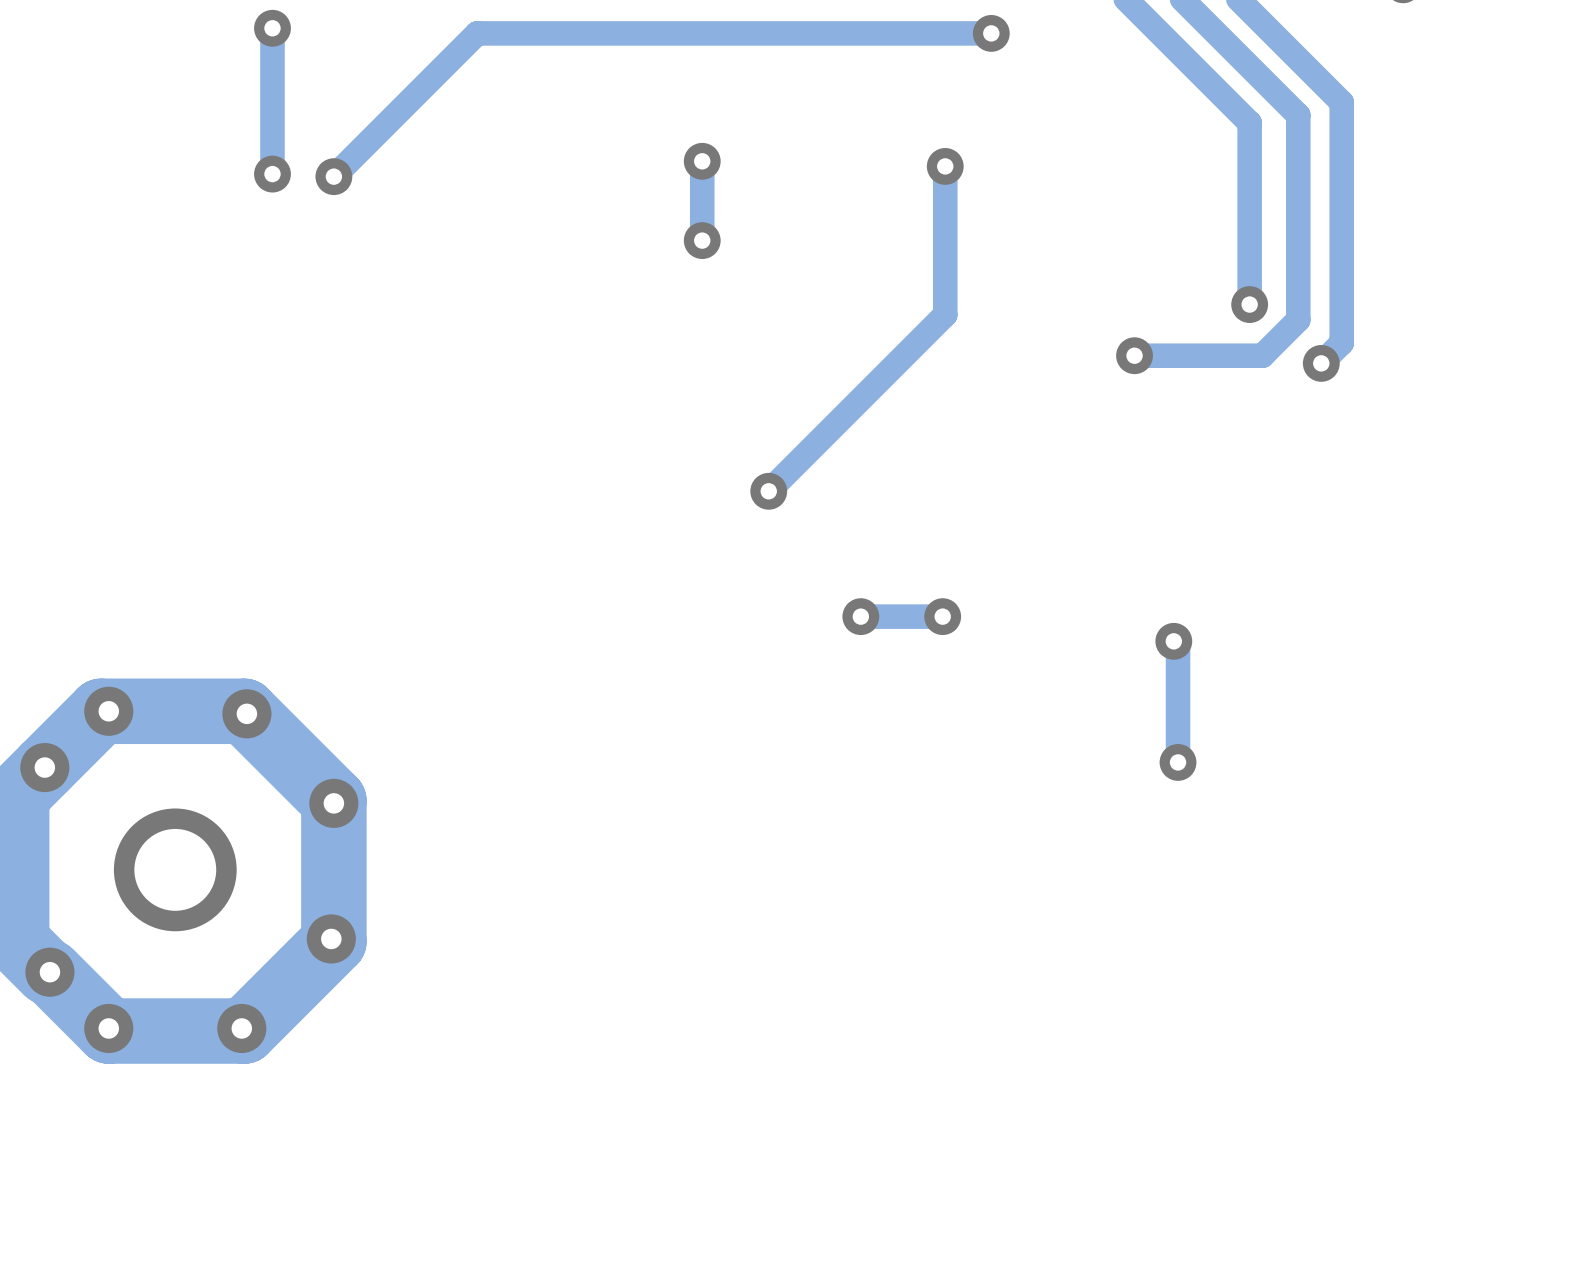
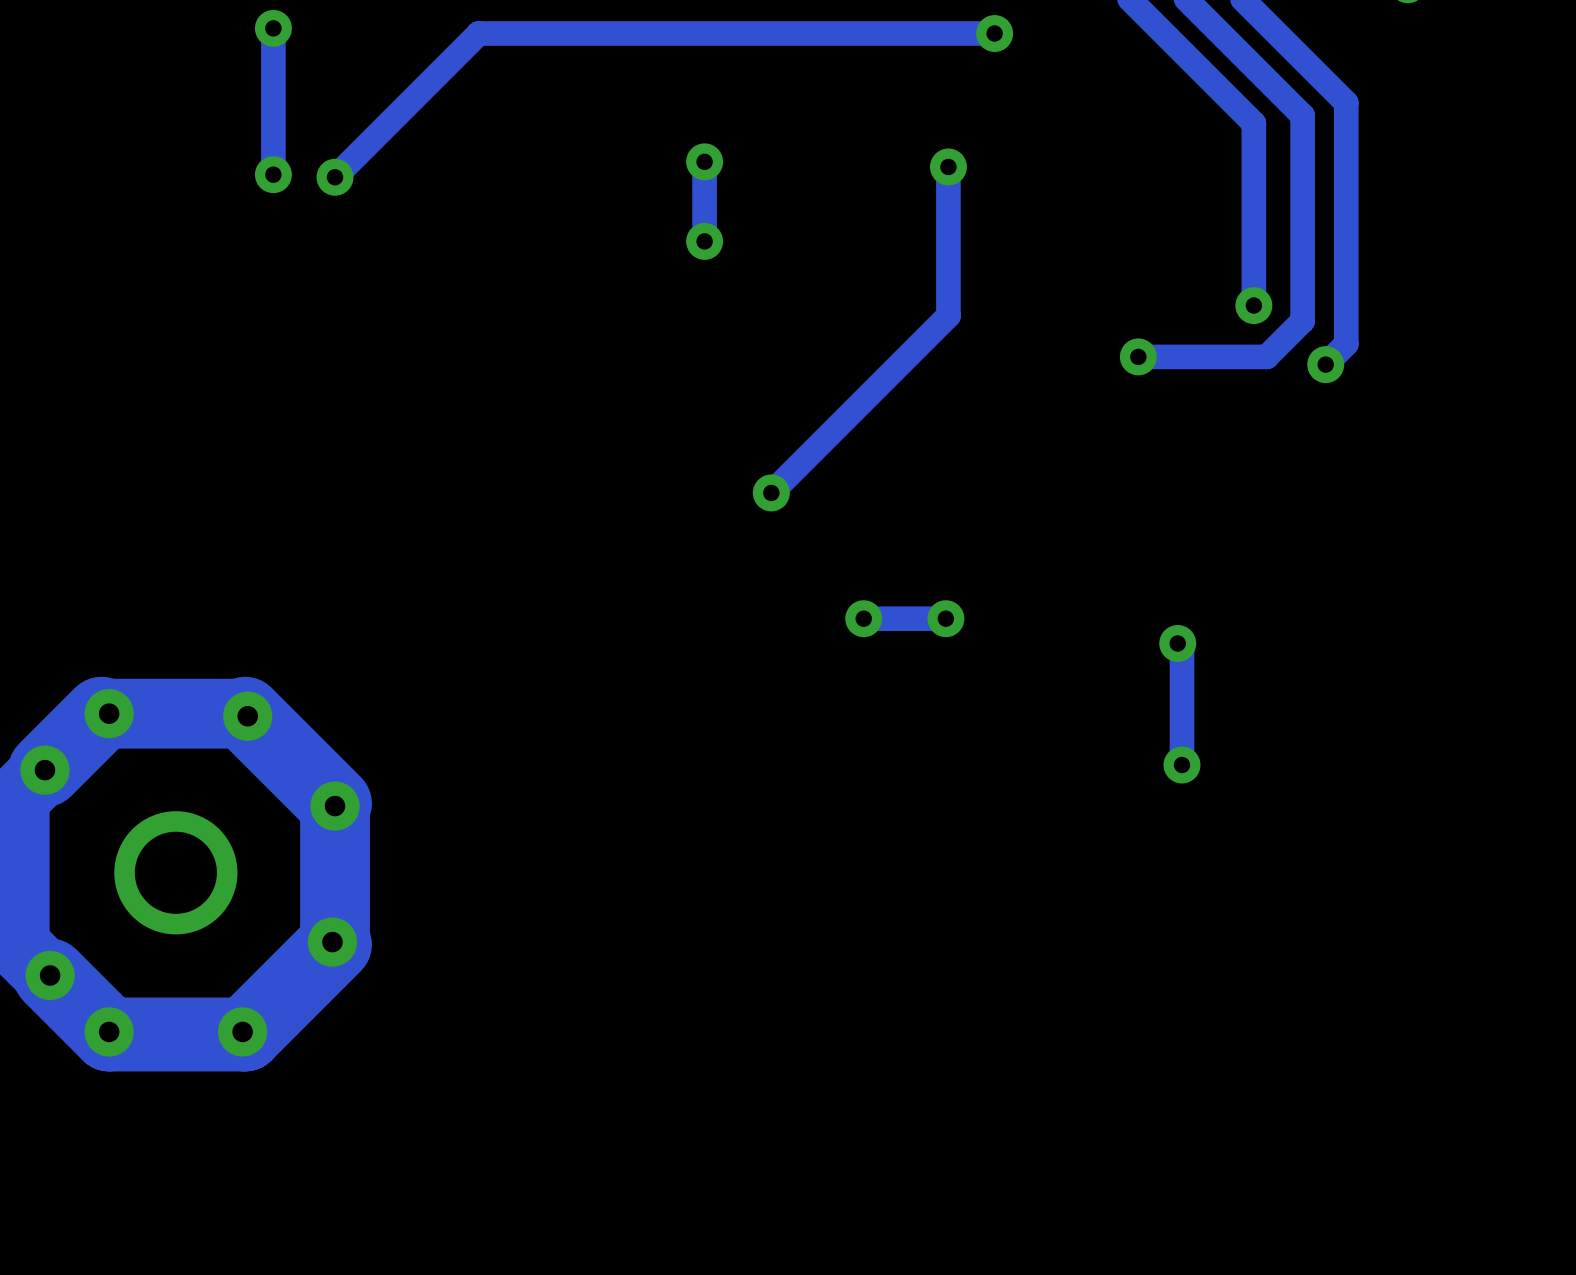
track width: thin (44, 767) (101, 711) (244, 711) (333, 800) (333, 941) (244, 1031) (108, 1031) (49, 972) -> thick (44, 770) (101, 713) (245, 713) (335, 803) (335, 944) (245, 1034) (109, 1034) (50, 975)

